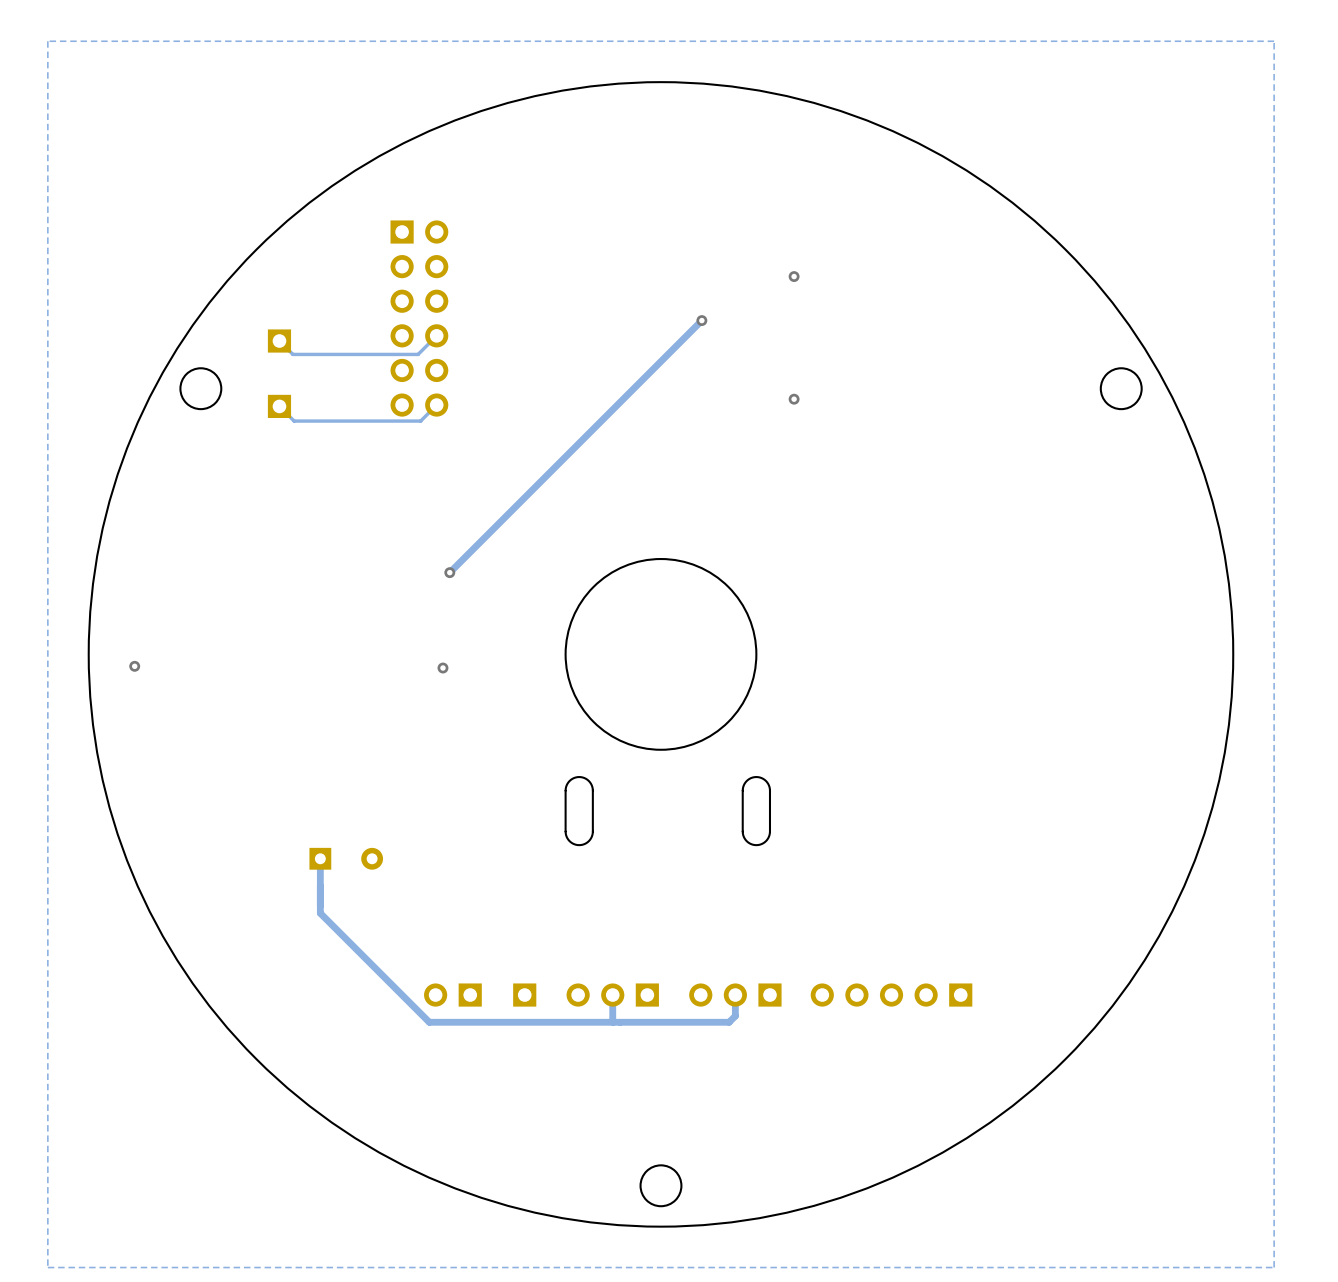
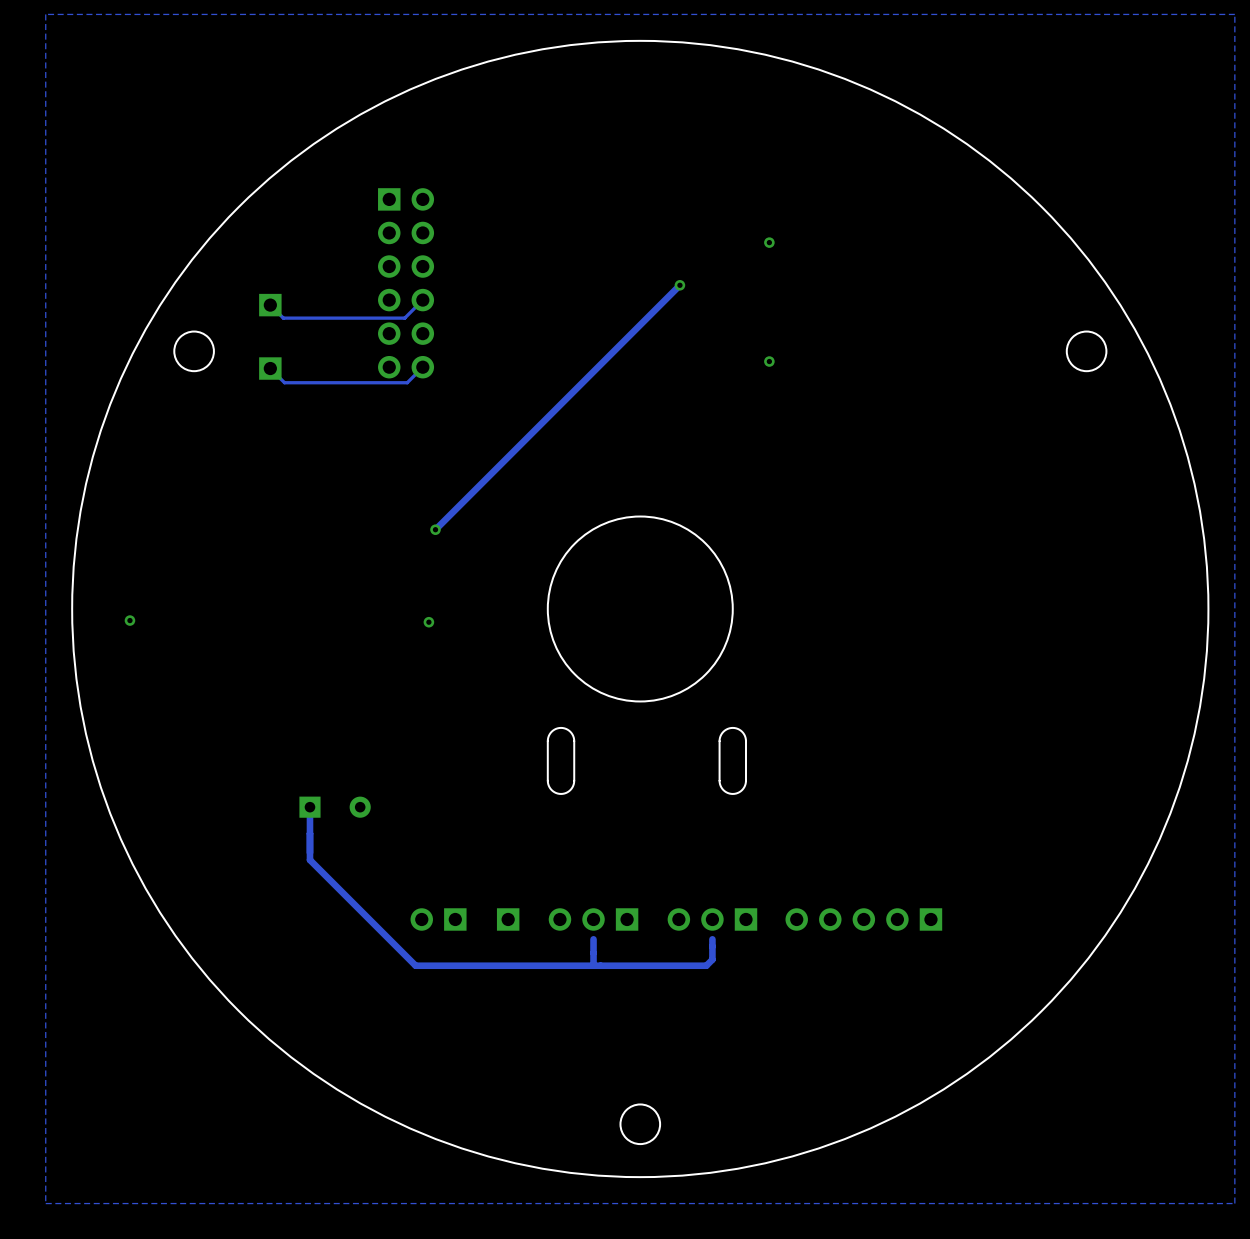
round board edge size: [87, 81, 1235, 1228] -> [71, 39, 1210, 1179]
part position: (452, 995) -> (438, 919)
part position: (524, 995) -> (508, 919)
part position: (612, 995) -> (593, 919)
part position: (735, 995) -> (712, 919)
part position: (891, 995) -> (863, 919)

